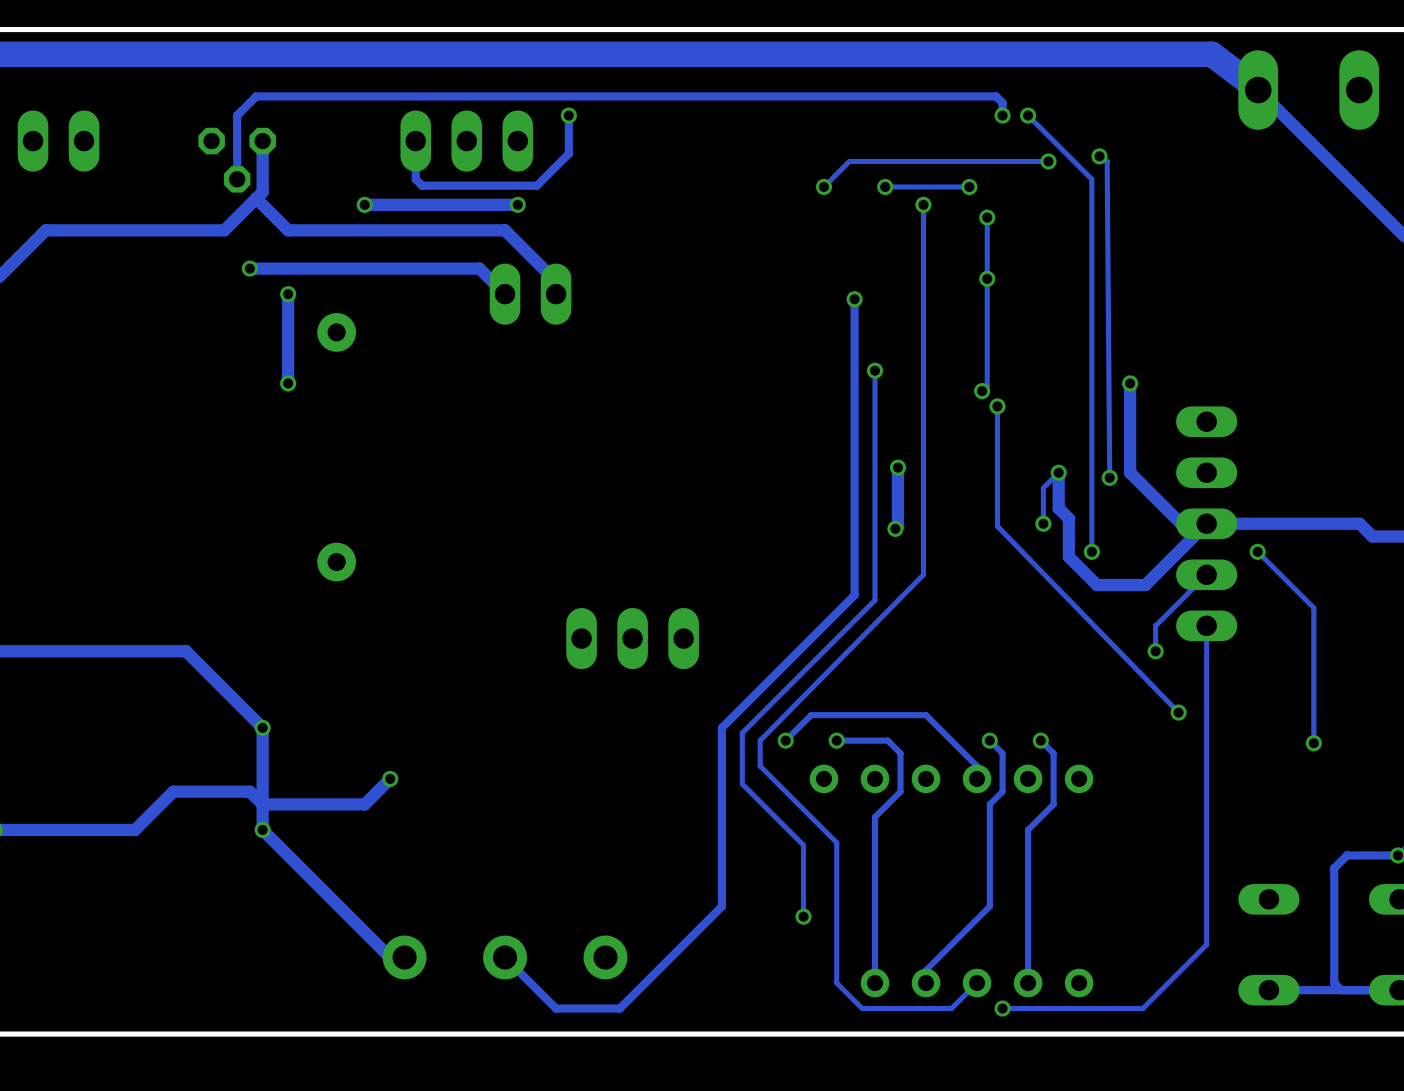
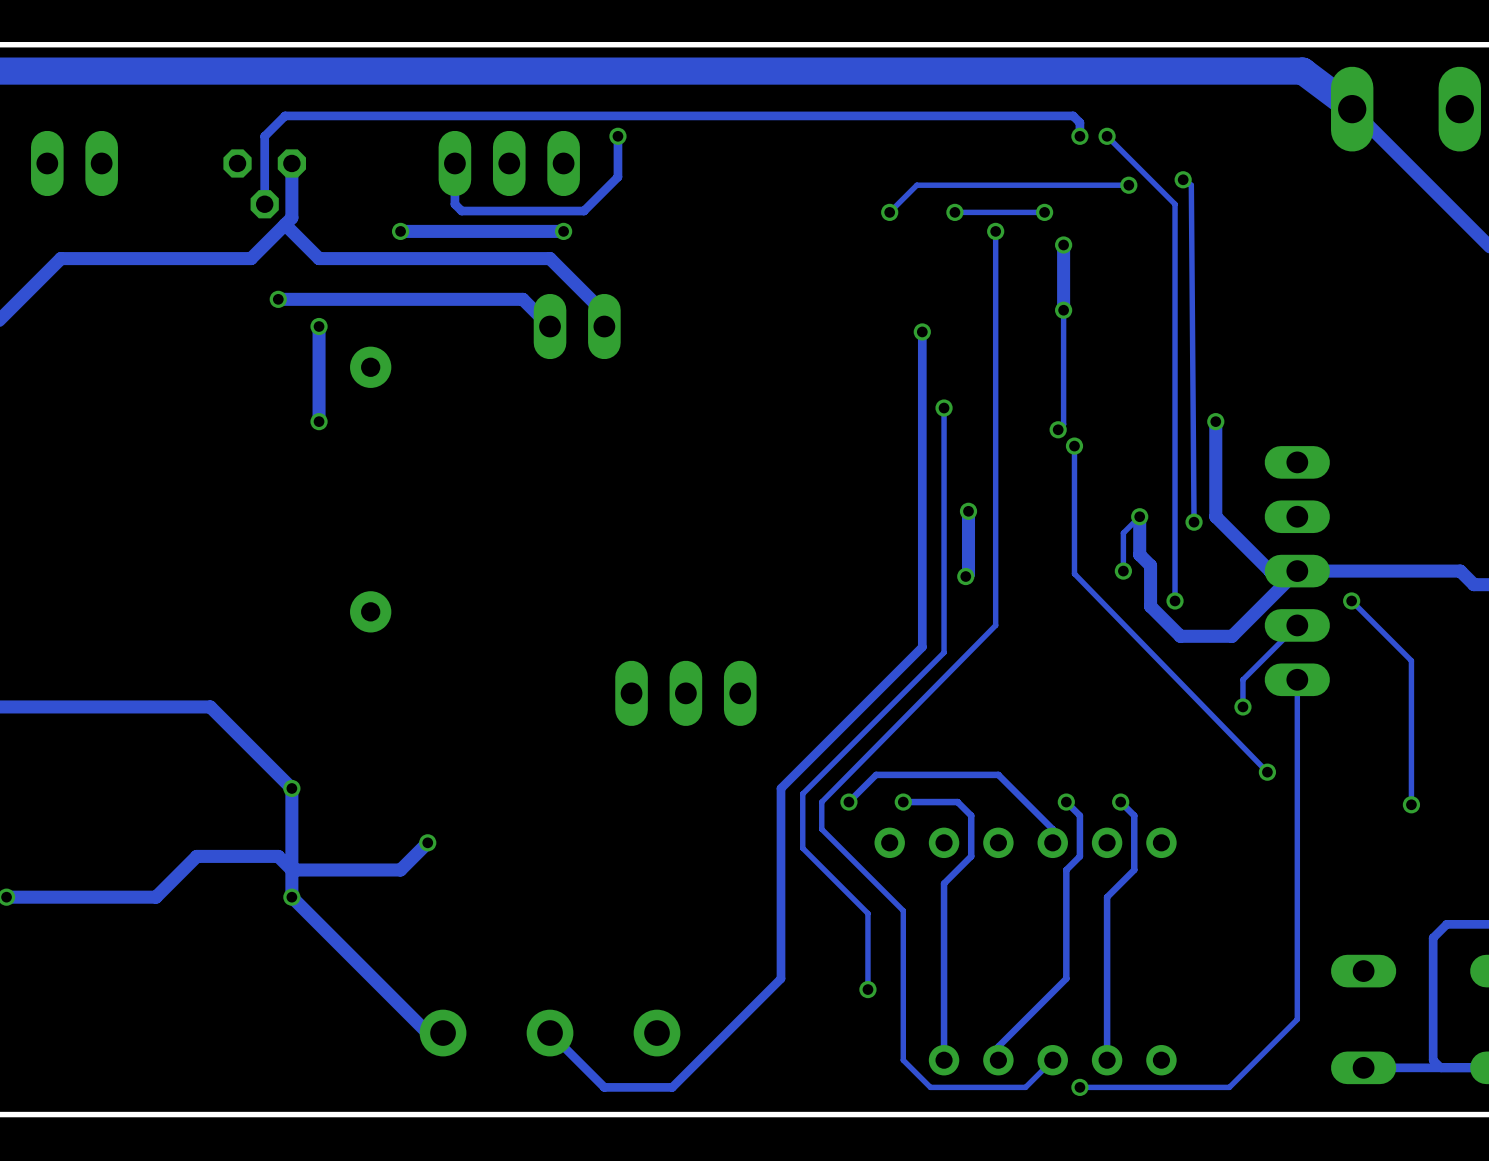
track width: thin (987, 217) (987, 278) -> thick (1063, 245) (1063, 310)

